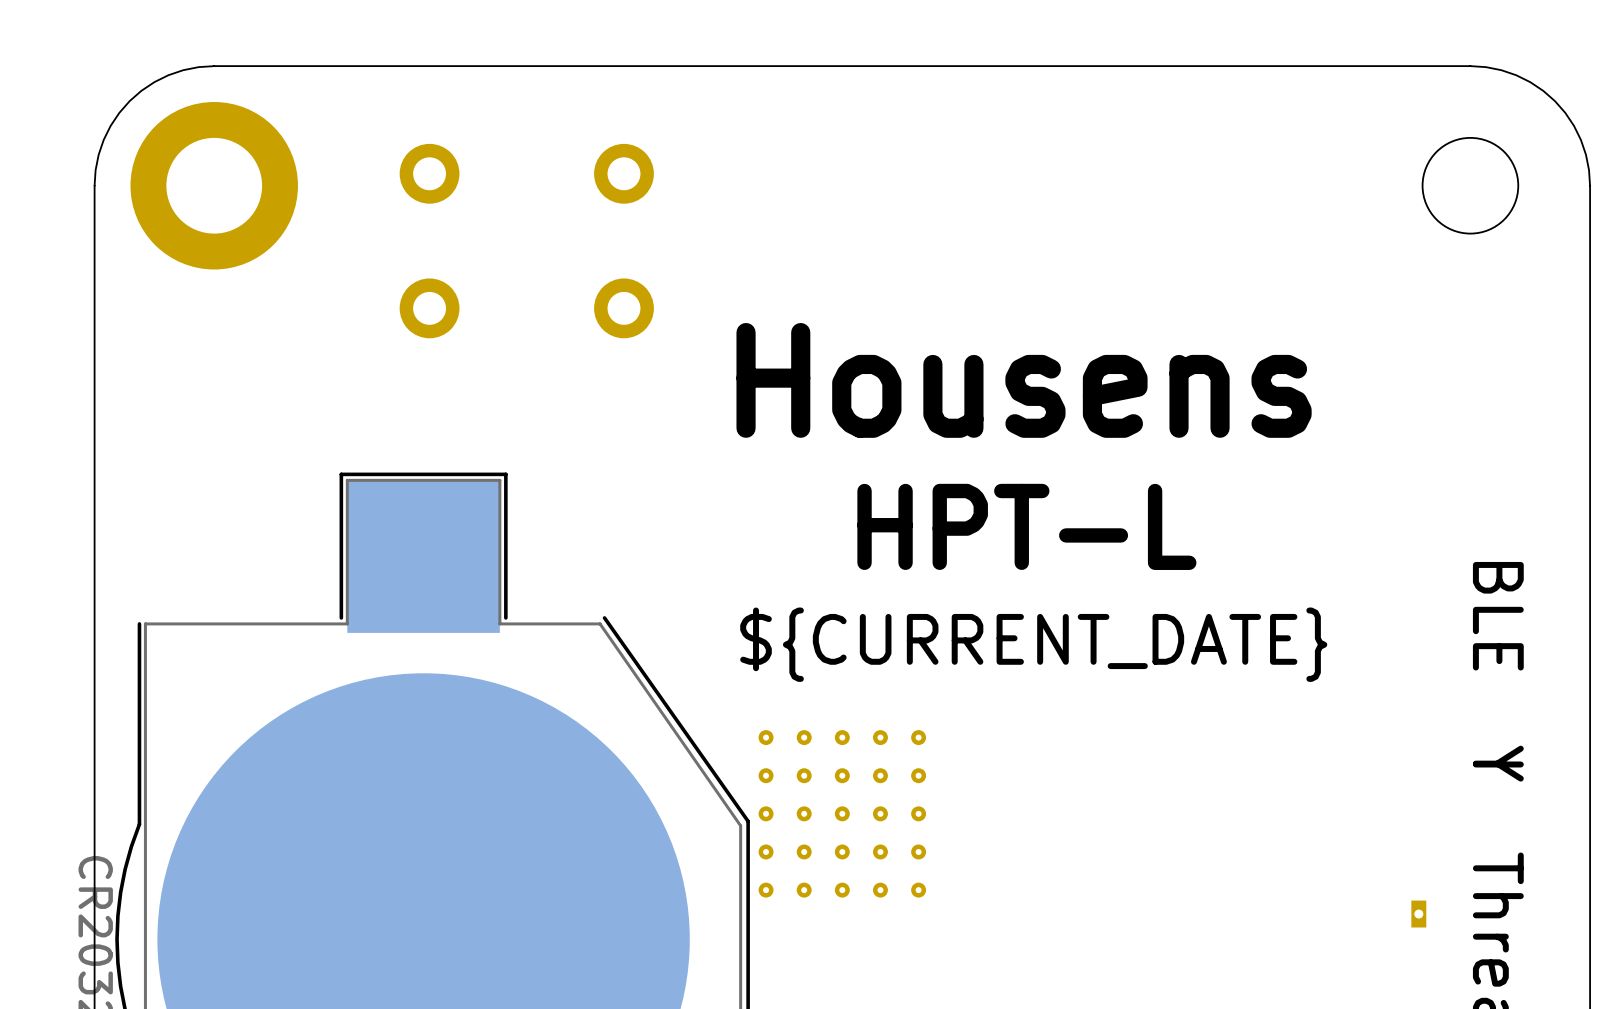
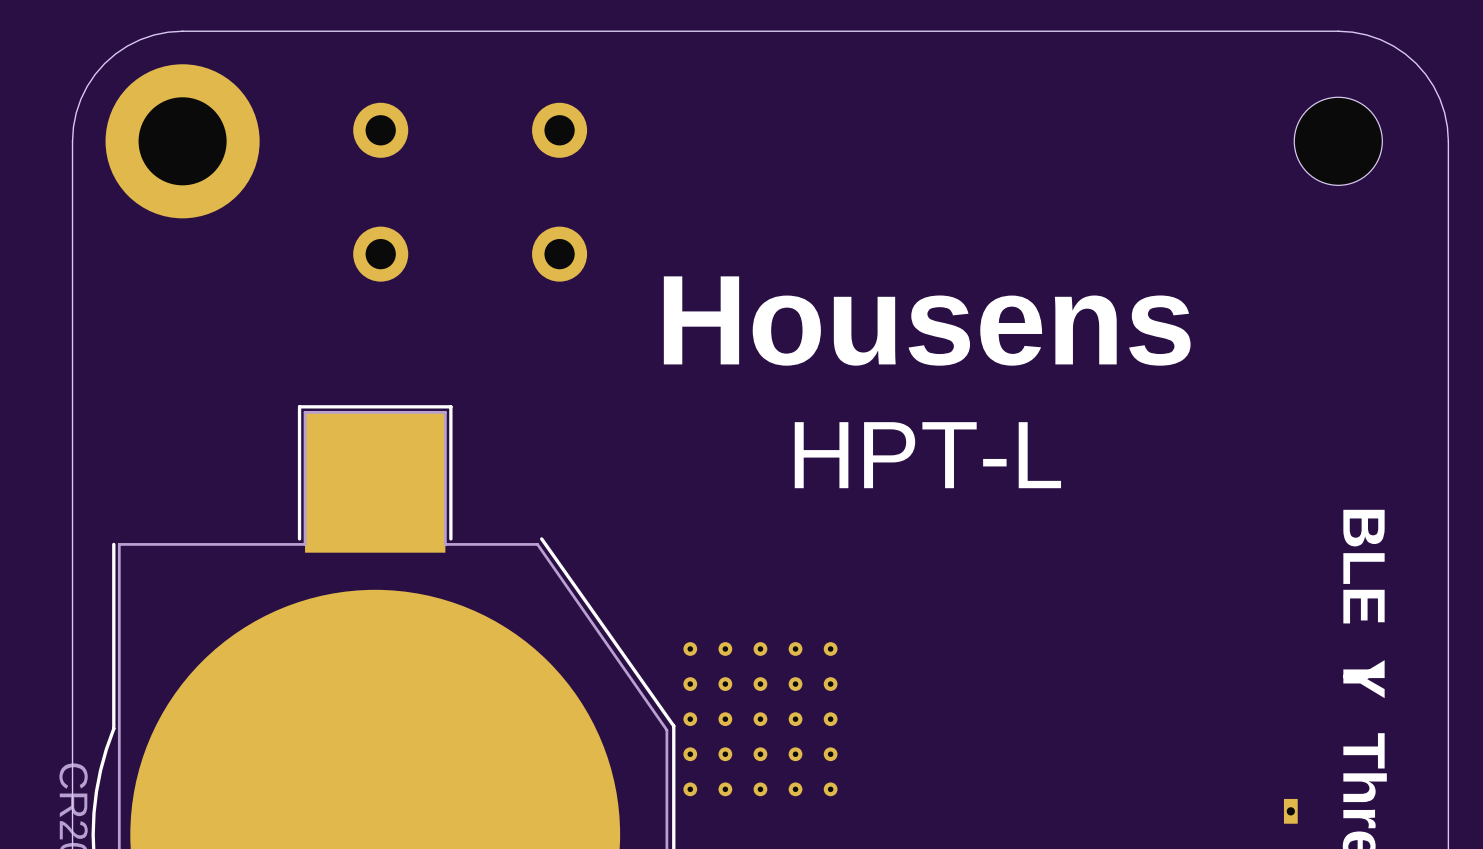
text: ${CURRENT_DATE} (1033, 644) -> none

